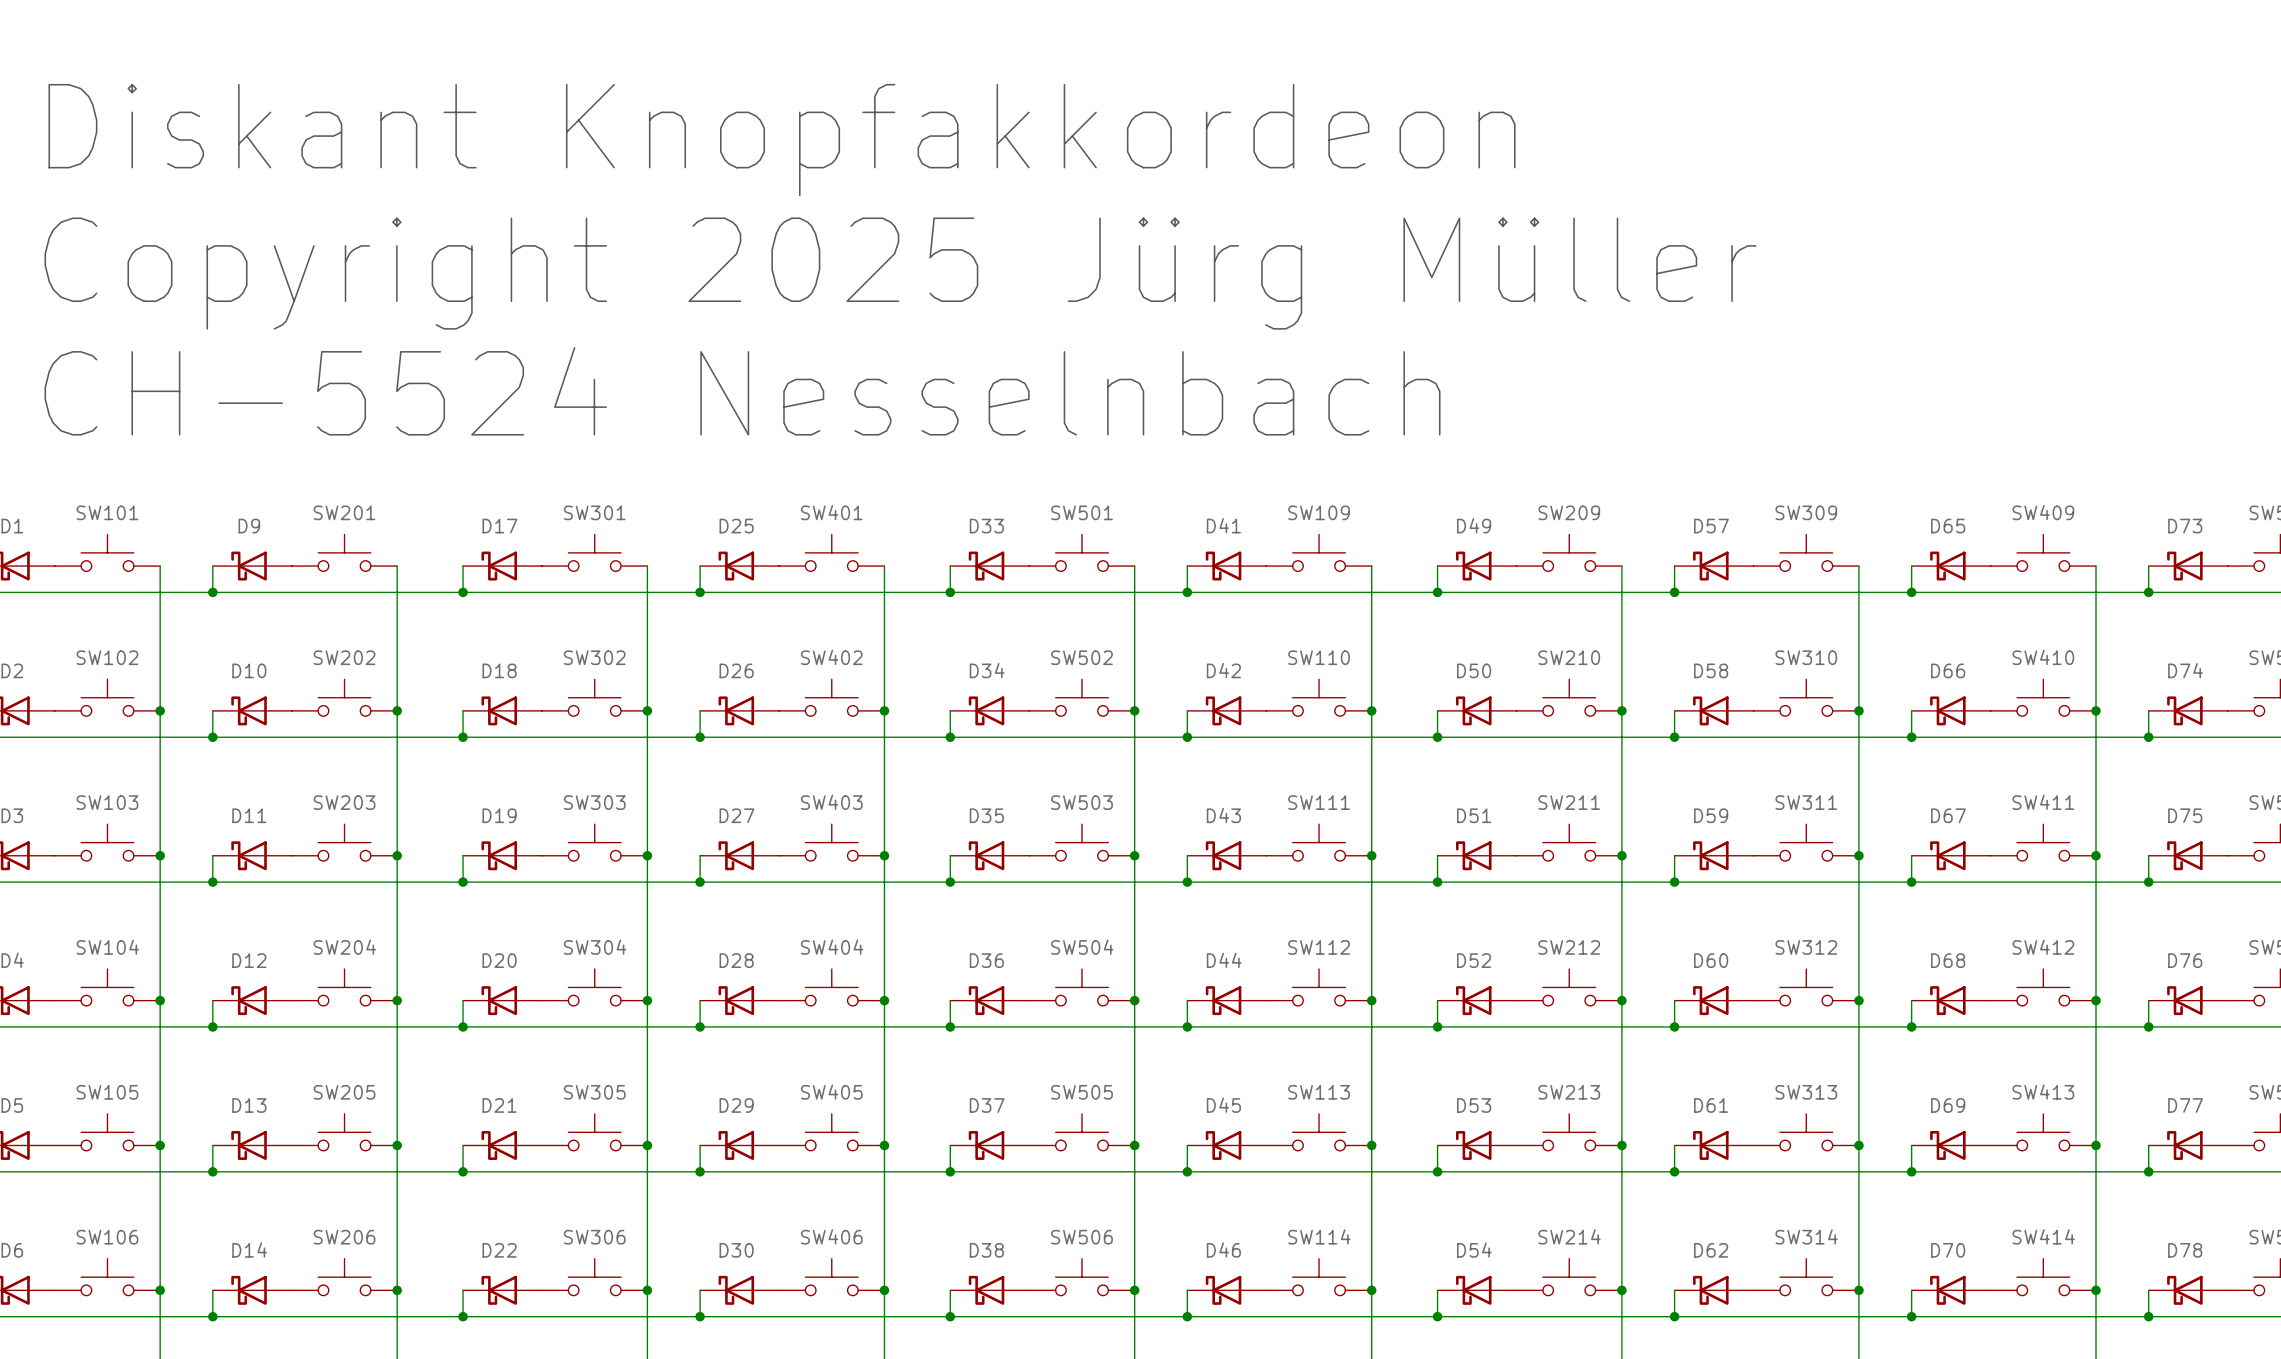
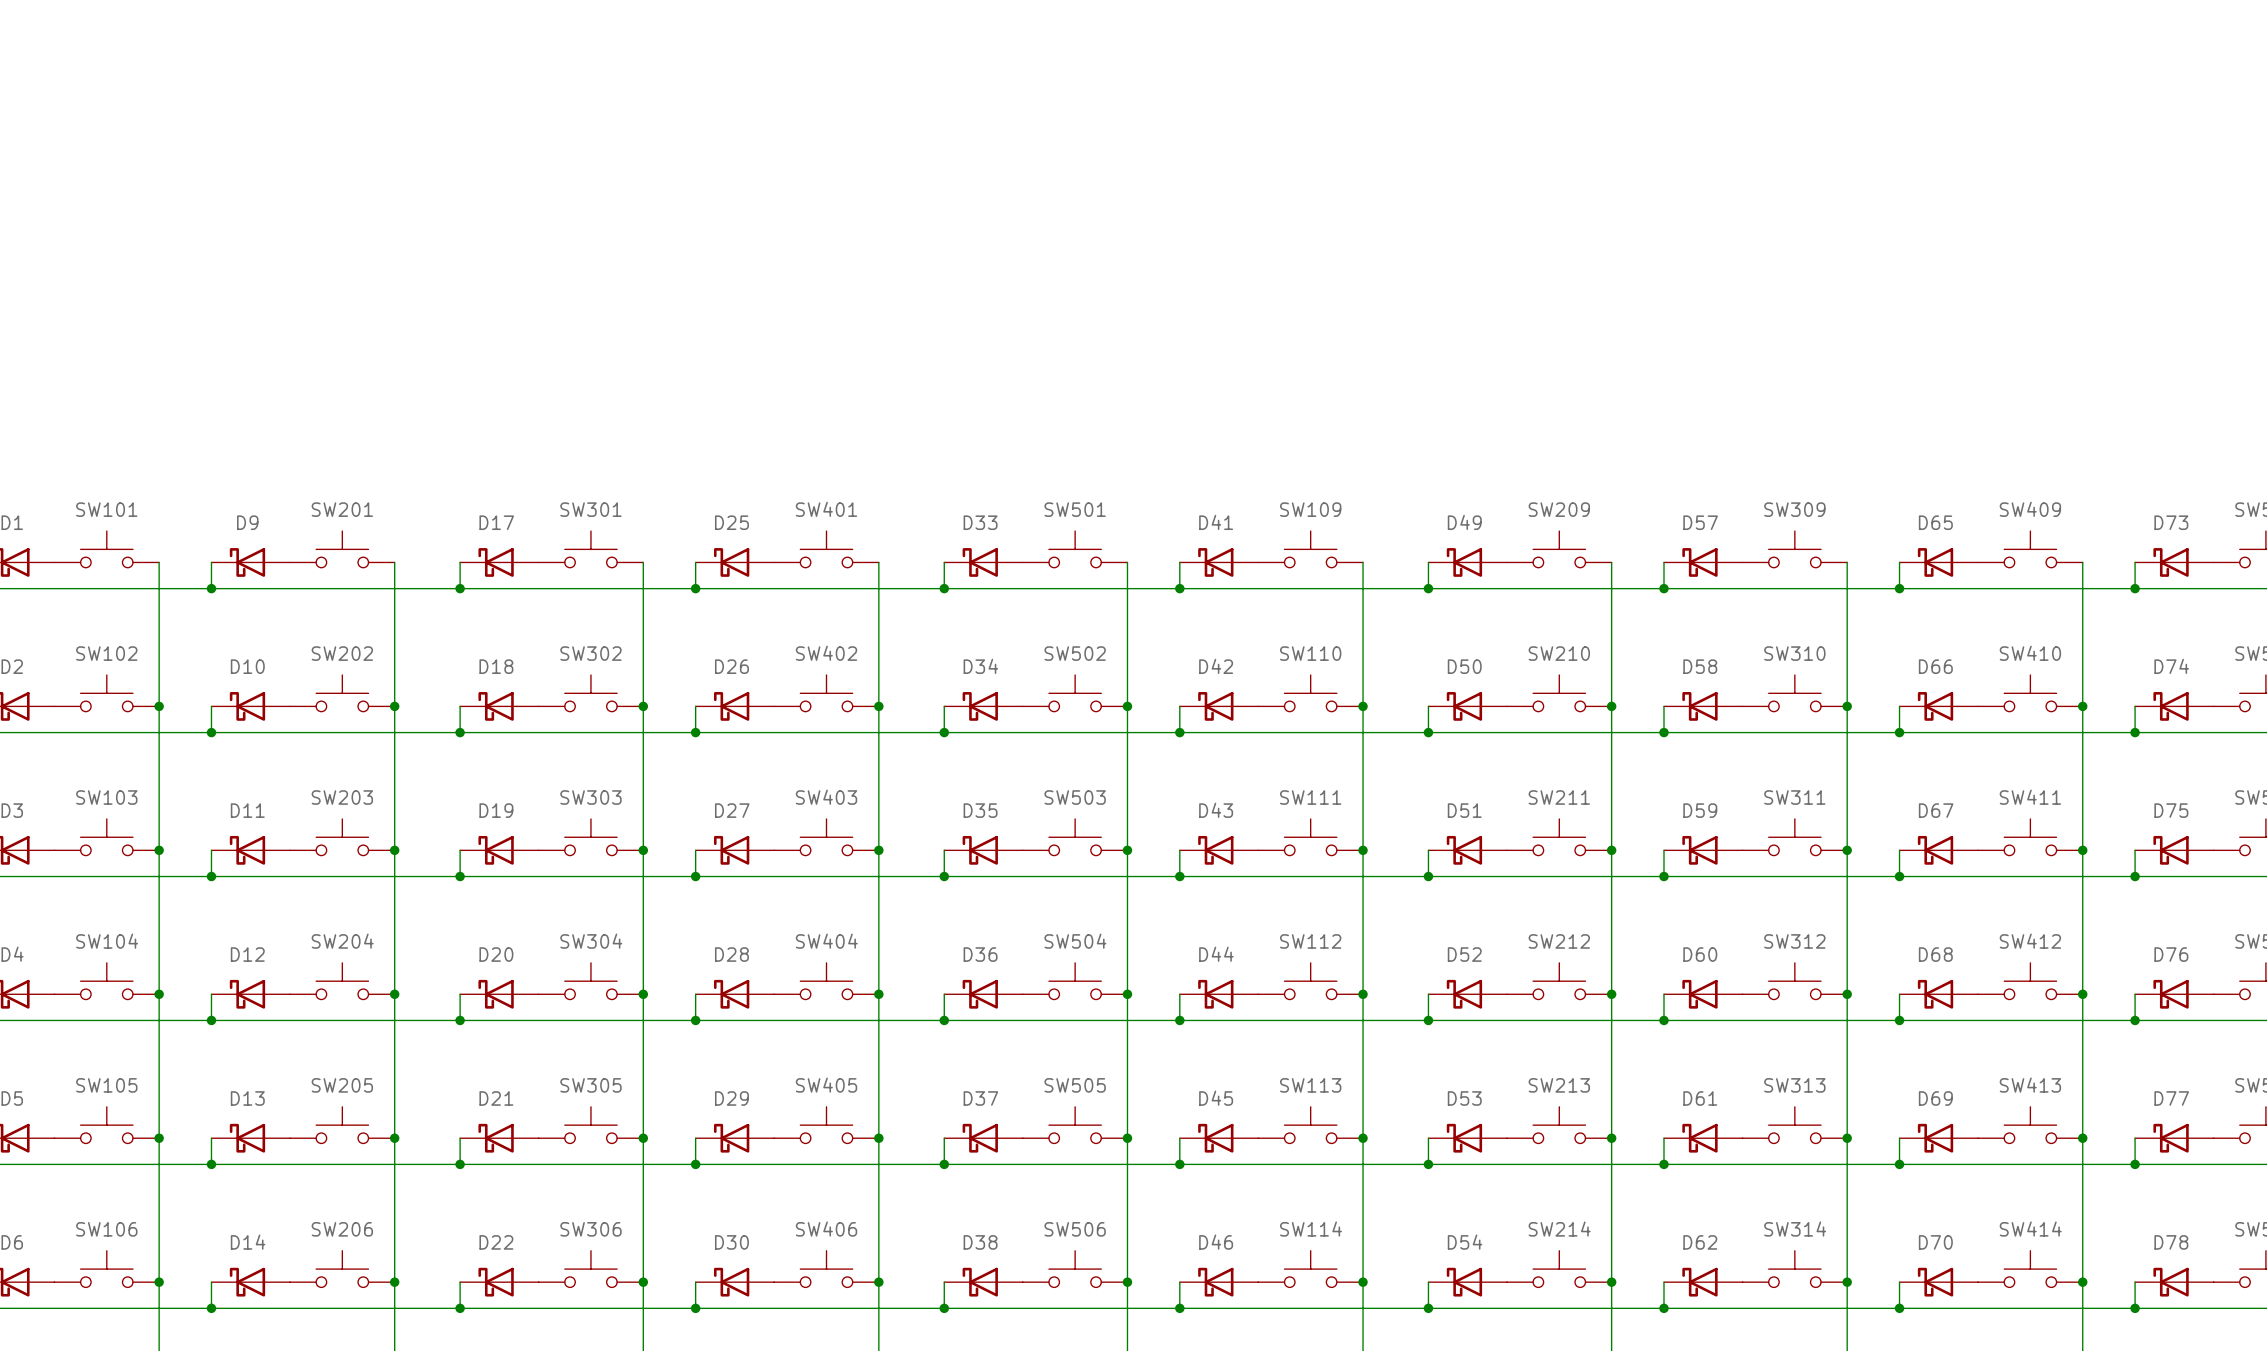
text: Diskant Knopfakkordeon (782, 140) -> none
text: Copyright 2025 Jürg Müller (900, 273) -> none
text: CH-5524 Nesselnbach (742, 391) -> none

